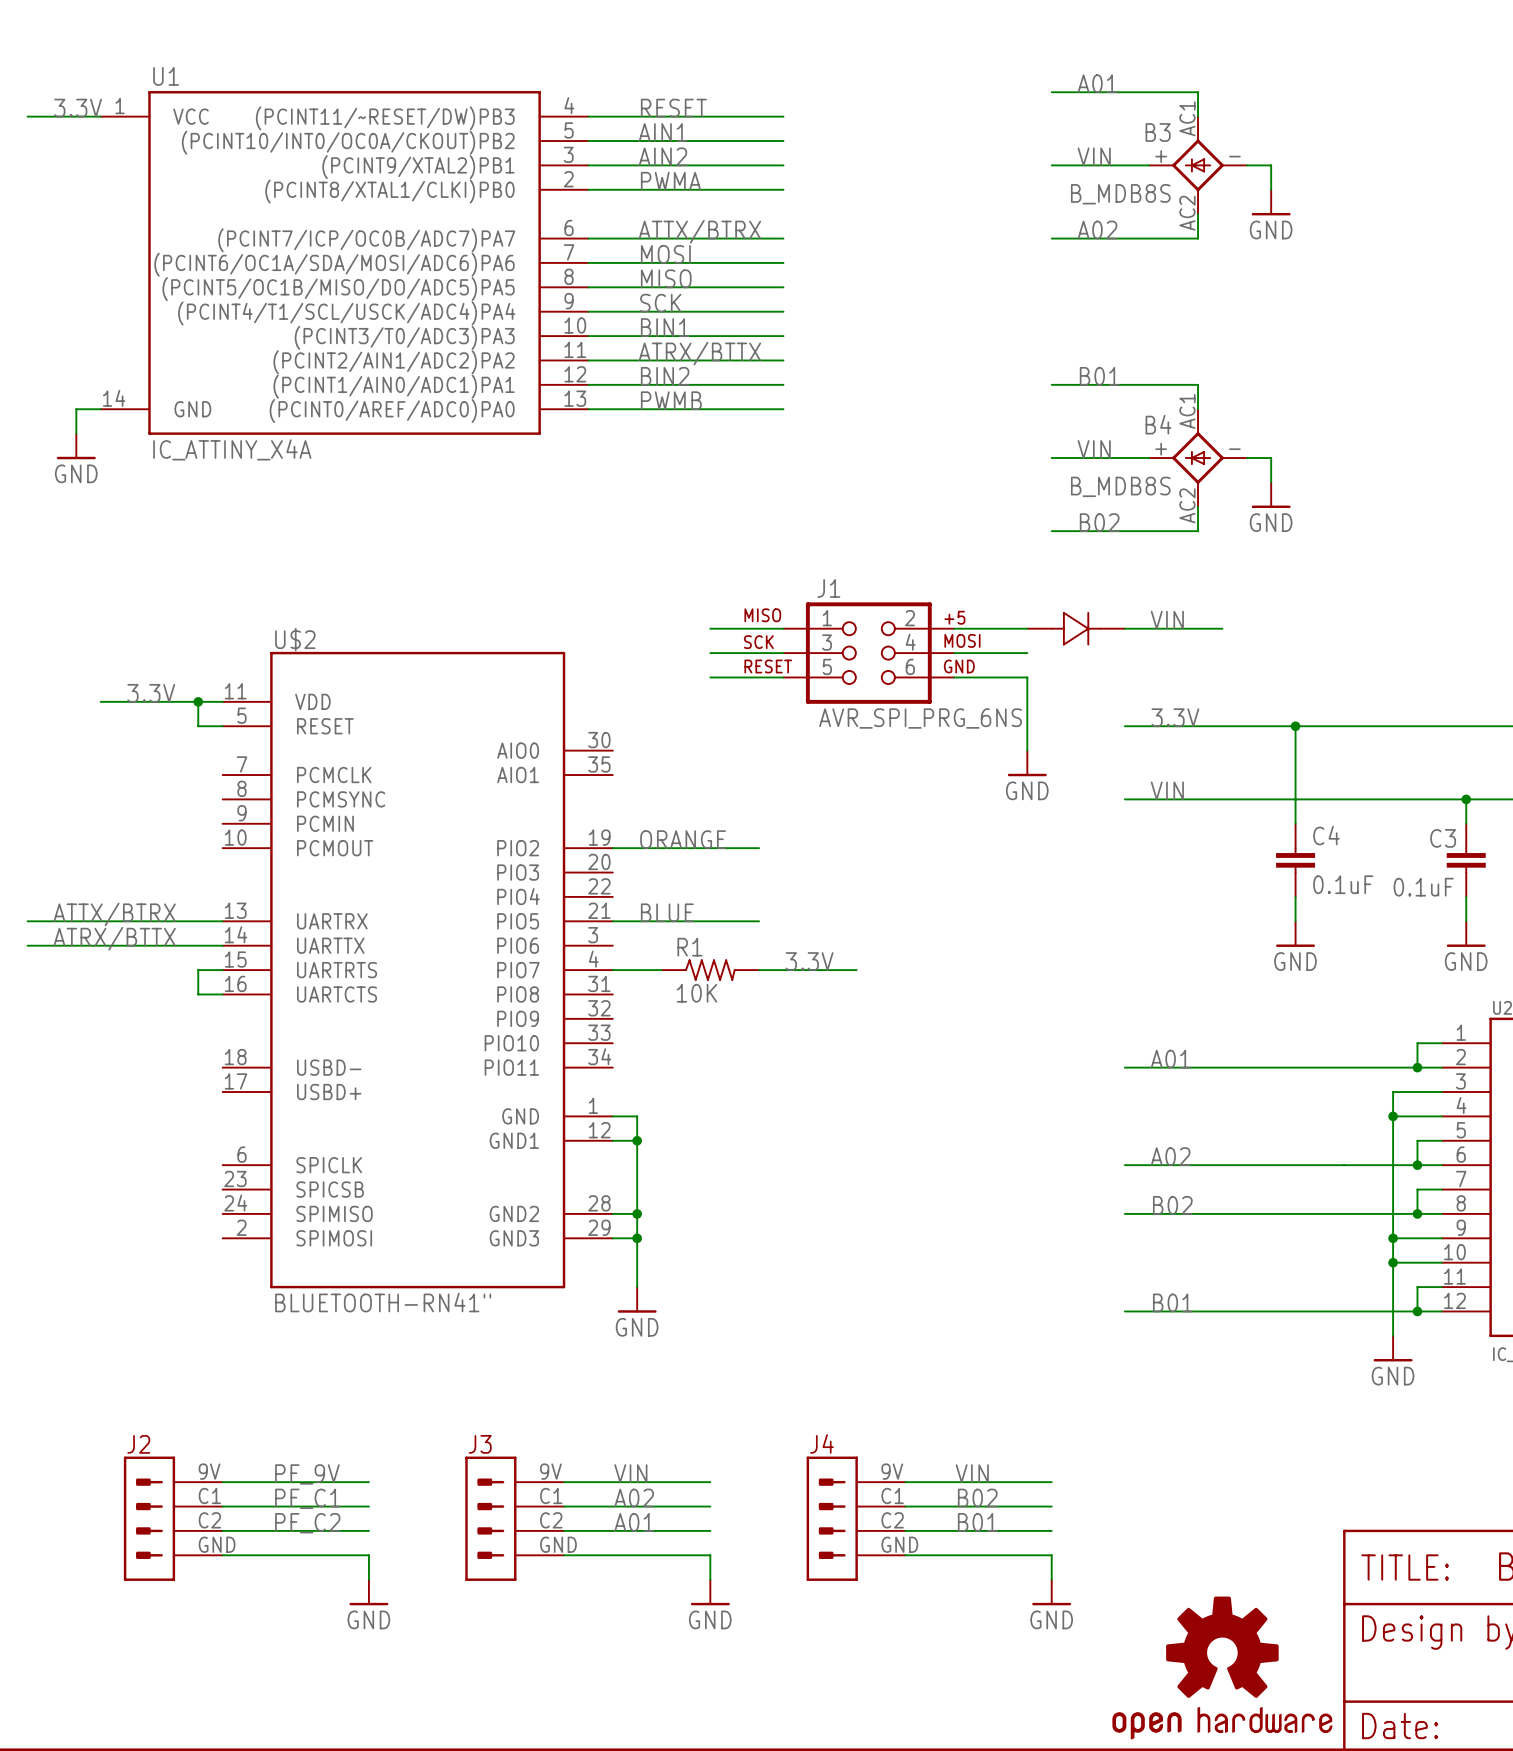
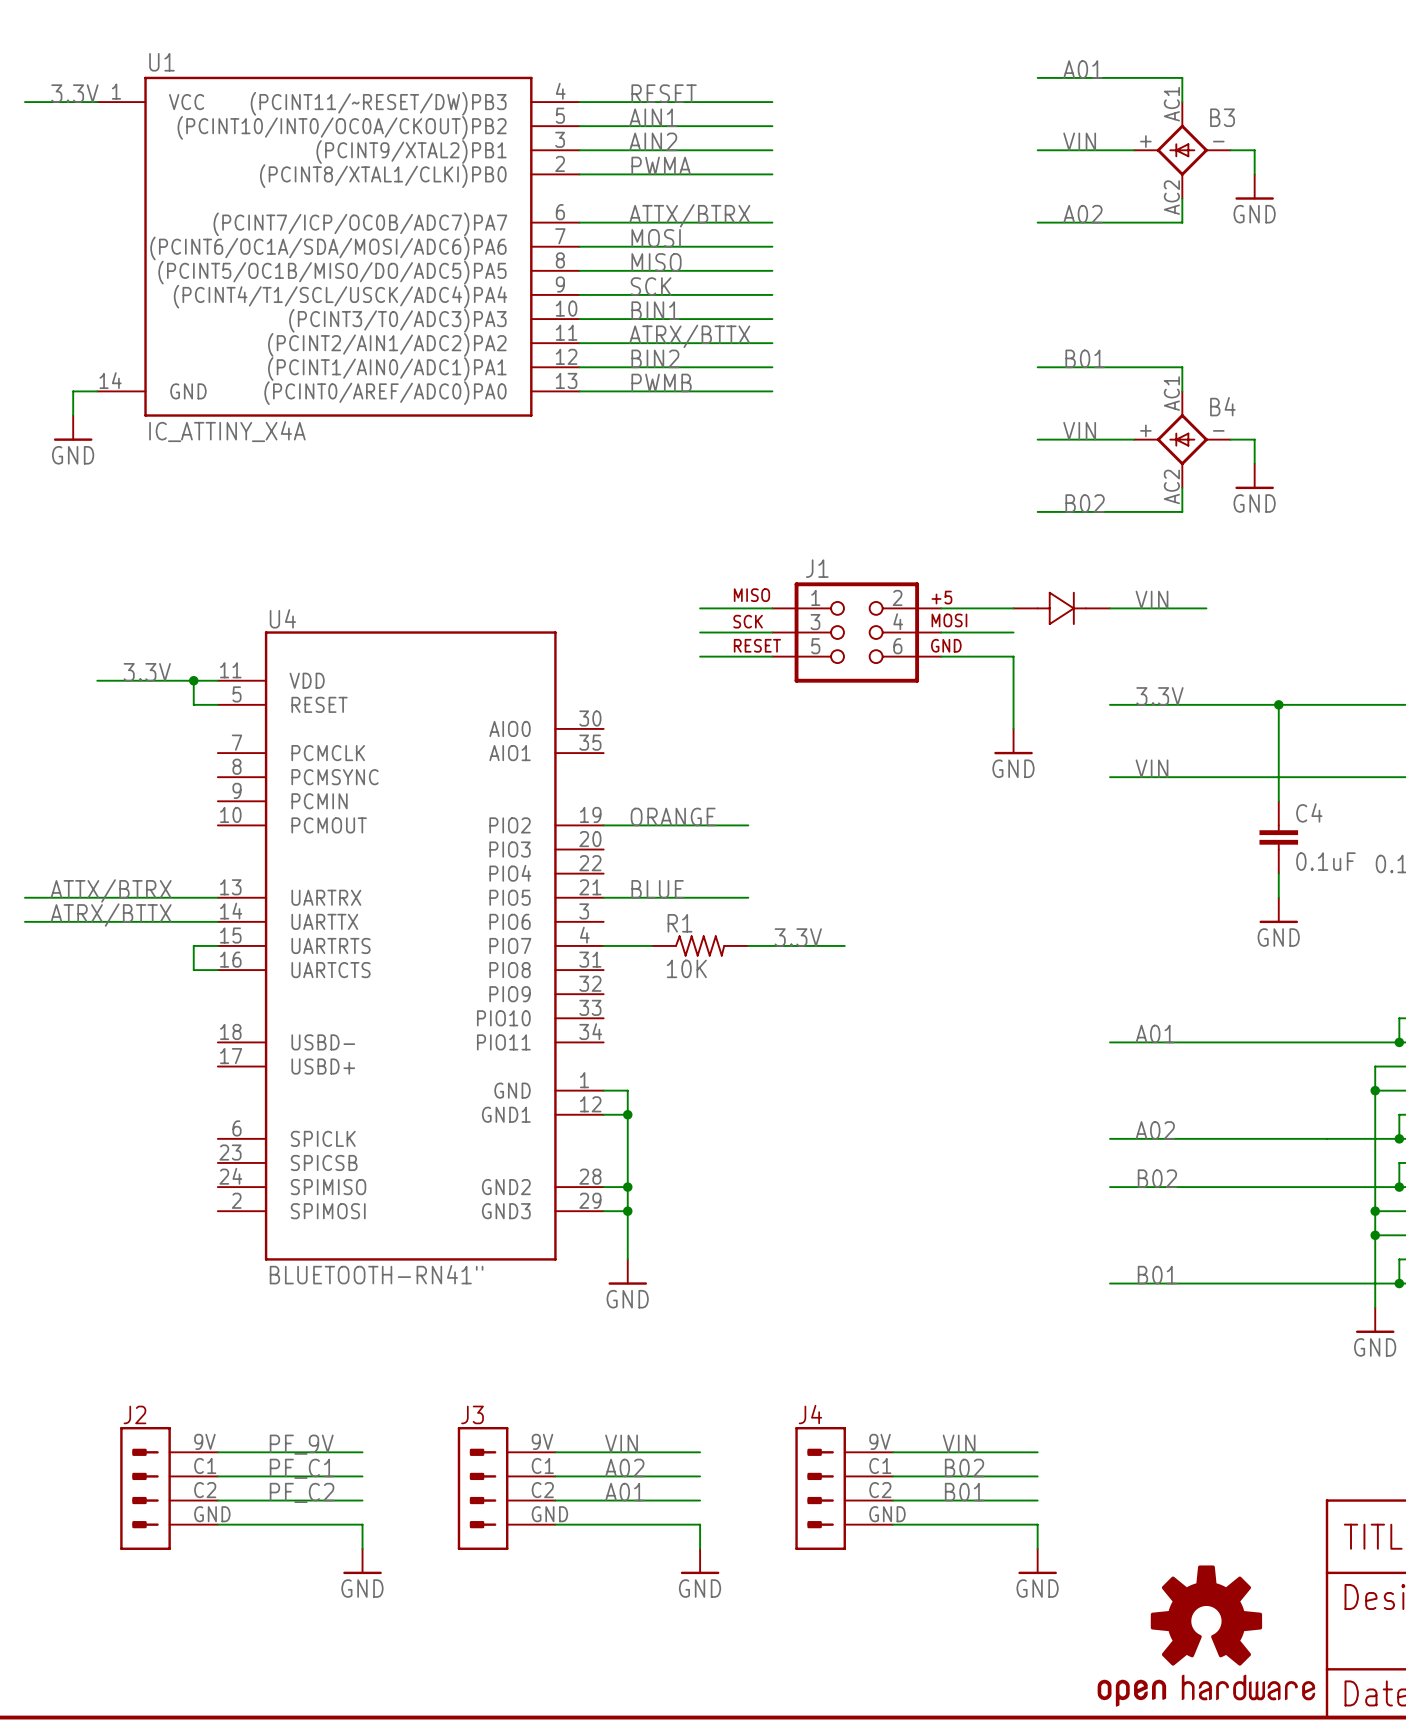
B3 name position: B3 (1158, 132) -> B3 (1222, 117)
B3 value: B_MDB8S (1120, 194) -> none
B4 name position: B4 (1158, 424) -> B4 (1222, 406)
B4 value: B_MDB8S (1120, 486) -> none
U$2 name: U$2 (295, 639) -> U4 (282, 618)
J1 value: AVR_SPI_PRG_6NS (920, 718) -> none

